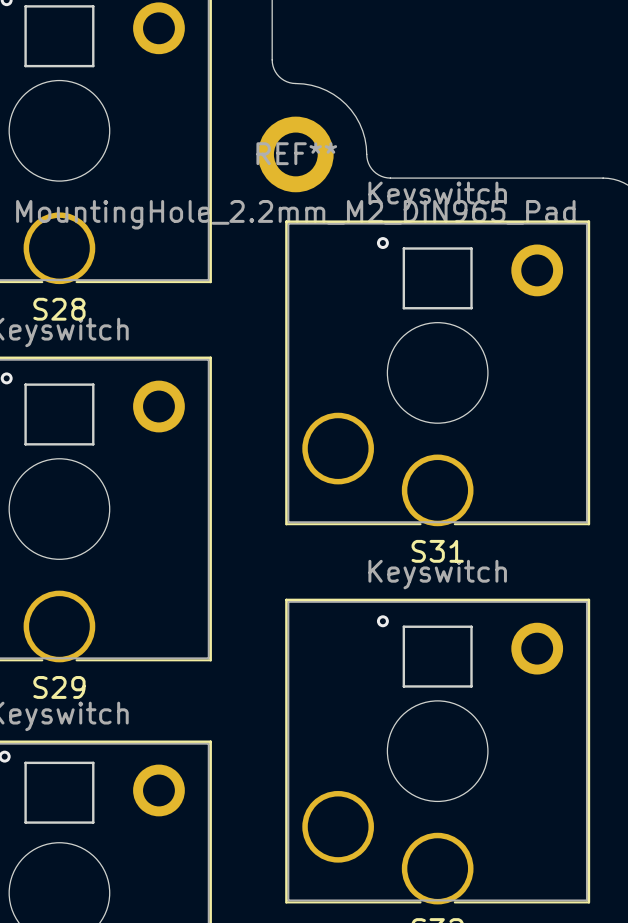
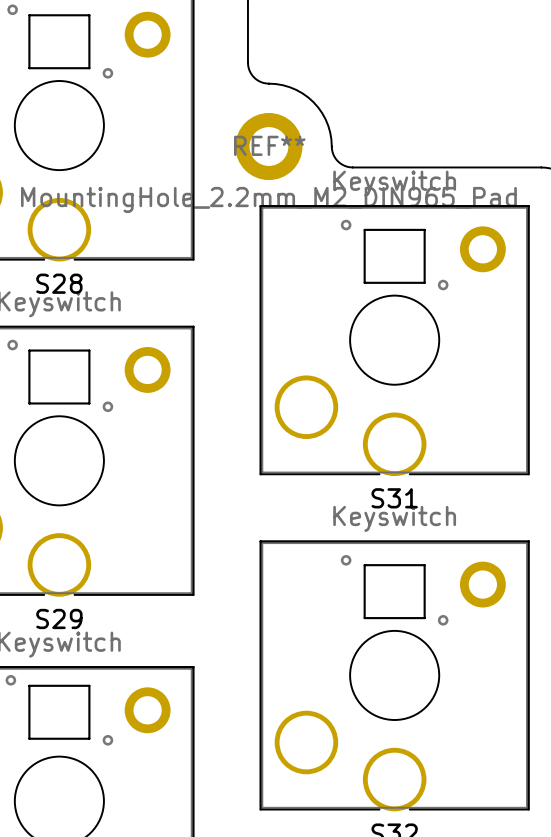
via: none -> (107, 73)
via: none -> (443, 285)
via: none -> (107, 406)
via: none -> (443, 620)
via: none -> (107, 740)

